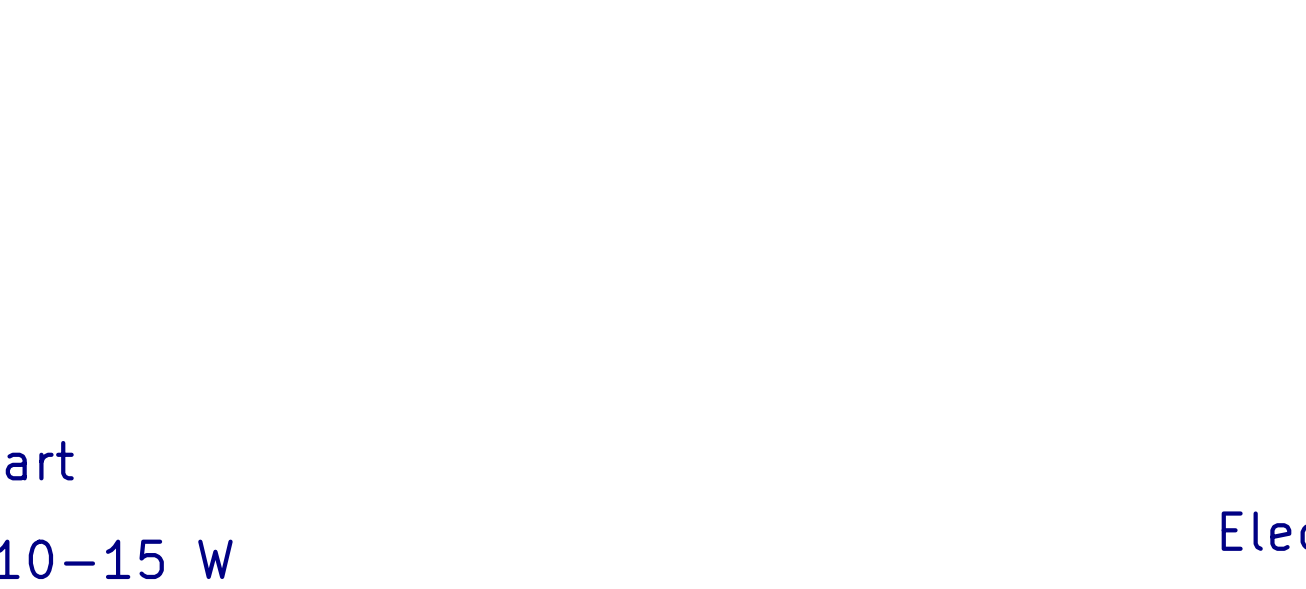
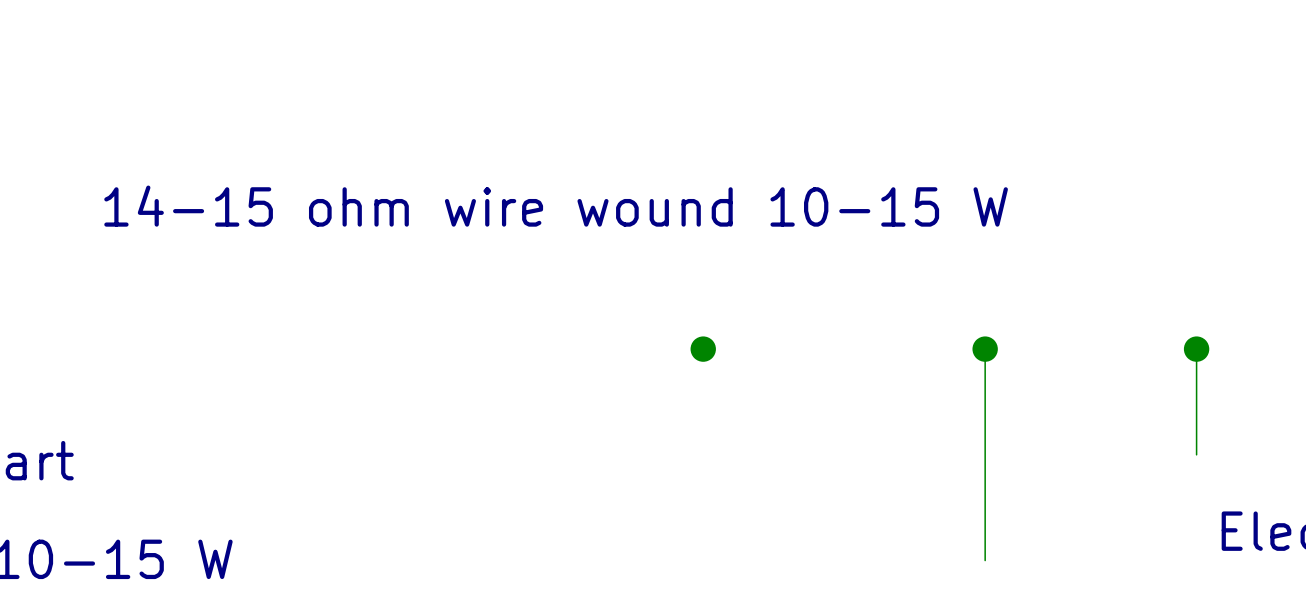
text: none -> 14-15 ohm wire wound 10-15 W (556, 206)
junction: none -> (703, 349)
wire: none -> (985, 349) (985, 560)
junction: none -> (985, 349)
wire: none -> (1196, 349) (1196, 454)
junction: none -> (1196, 349)

